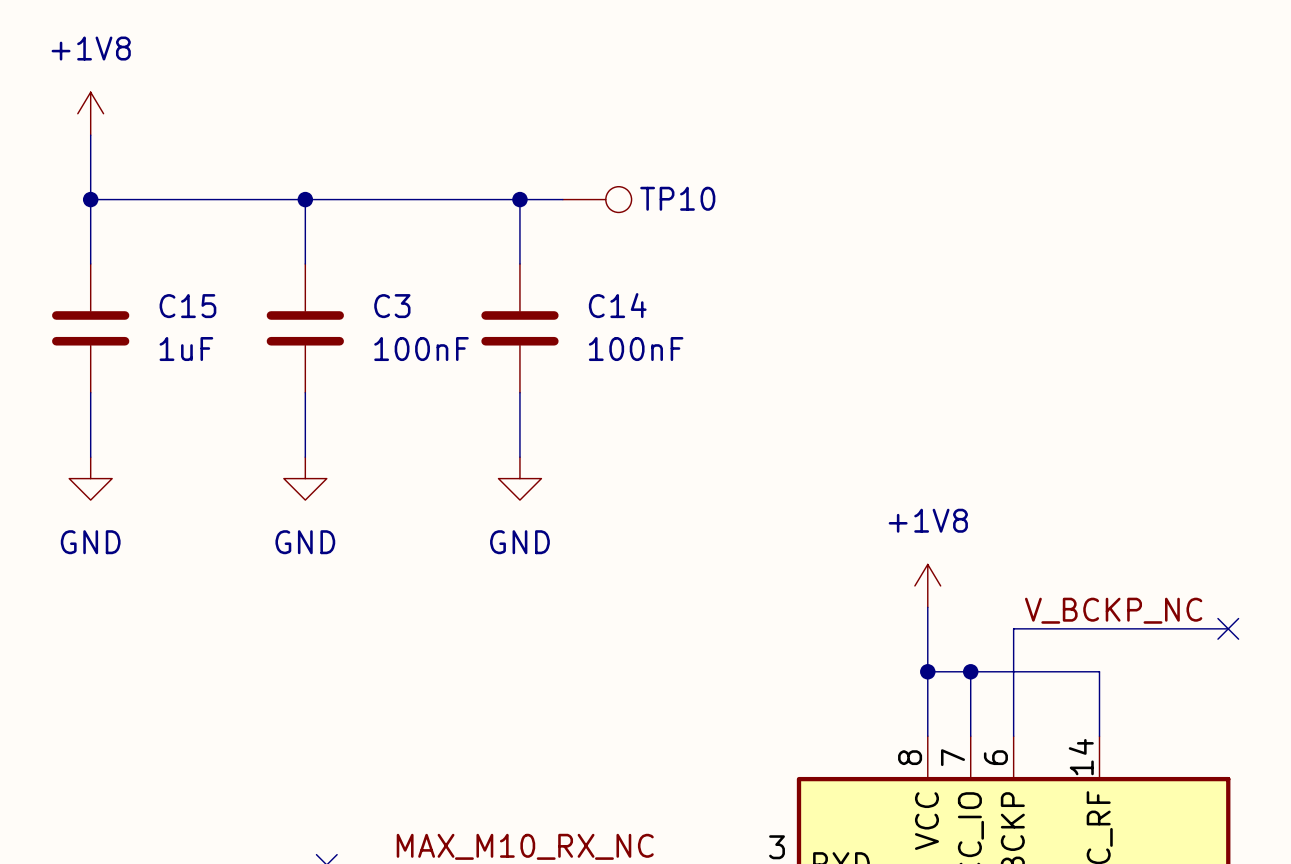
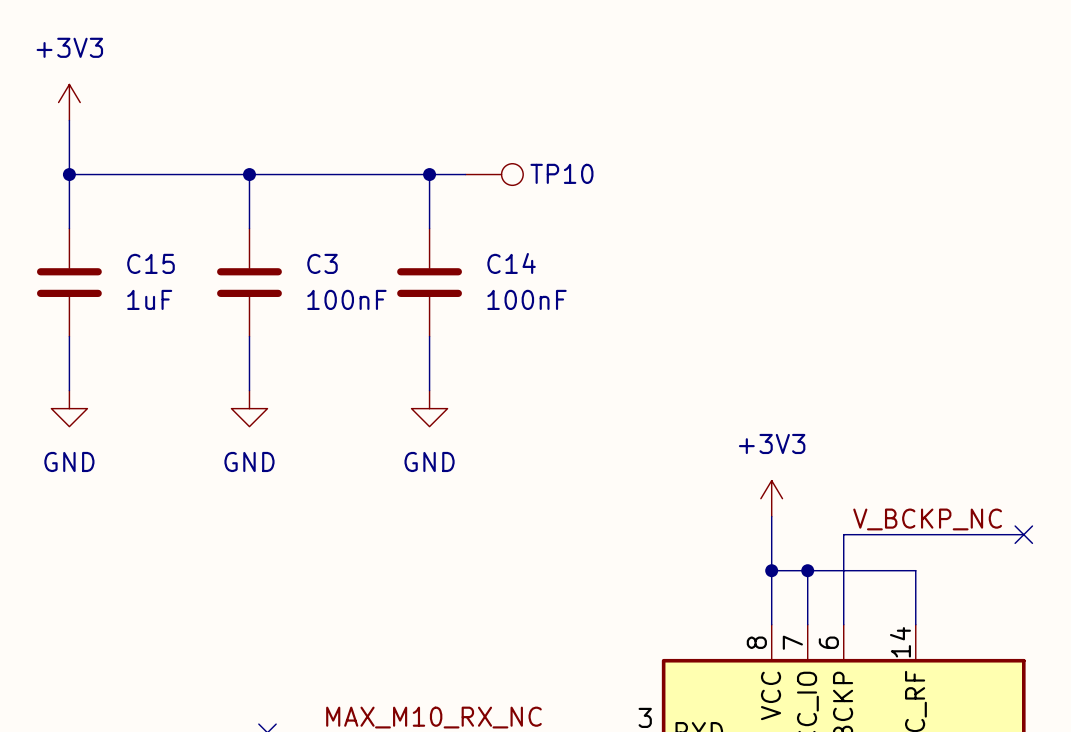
power symbol: +1V8 (90, 113) -> +3V3 (69, 102)
power symbol: +1V8 (927, 585) -> +3V3 (771, 498)

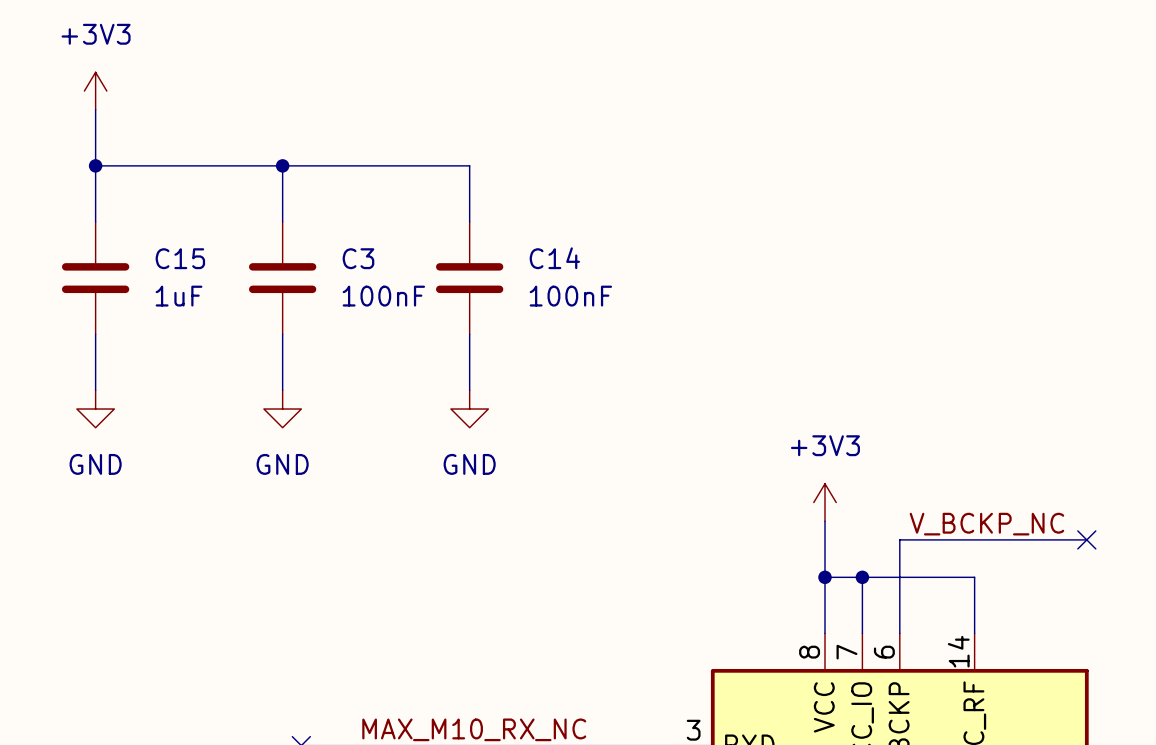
wire: (429, 174) (465, 174) -> none
junction: (429, 174) -> none
TP10: (494, 174) -> none

